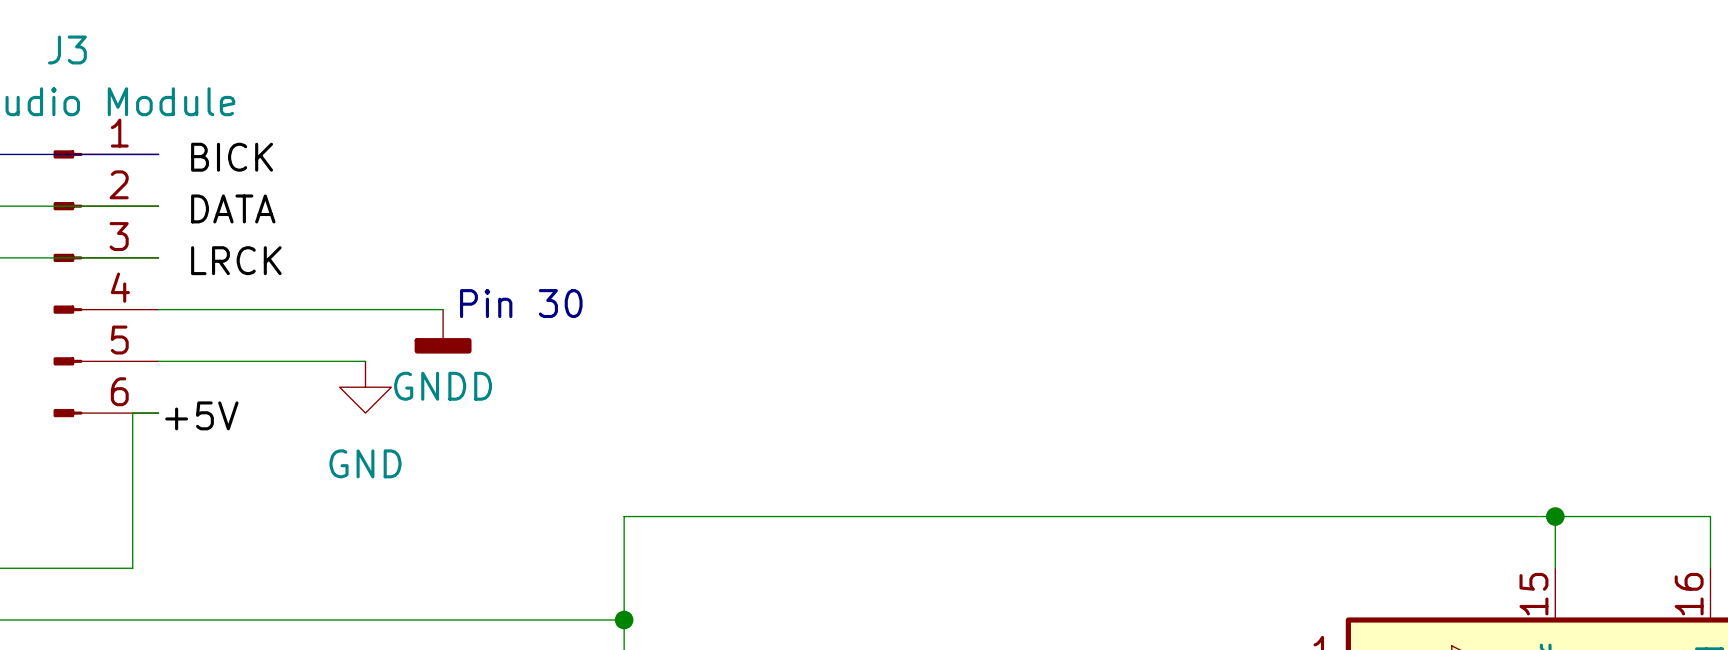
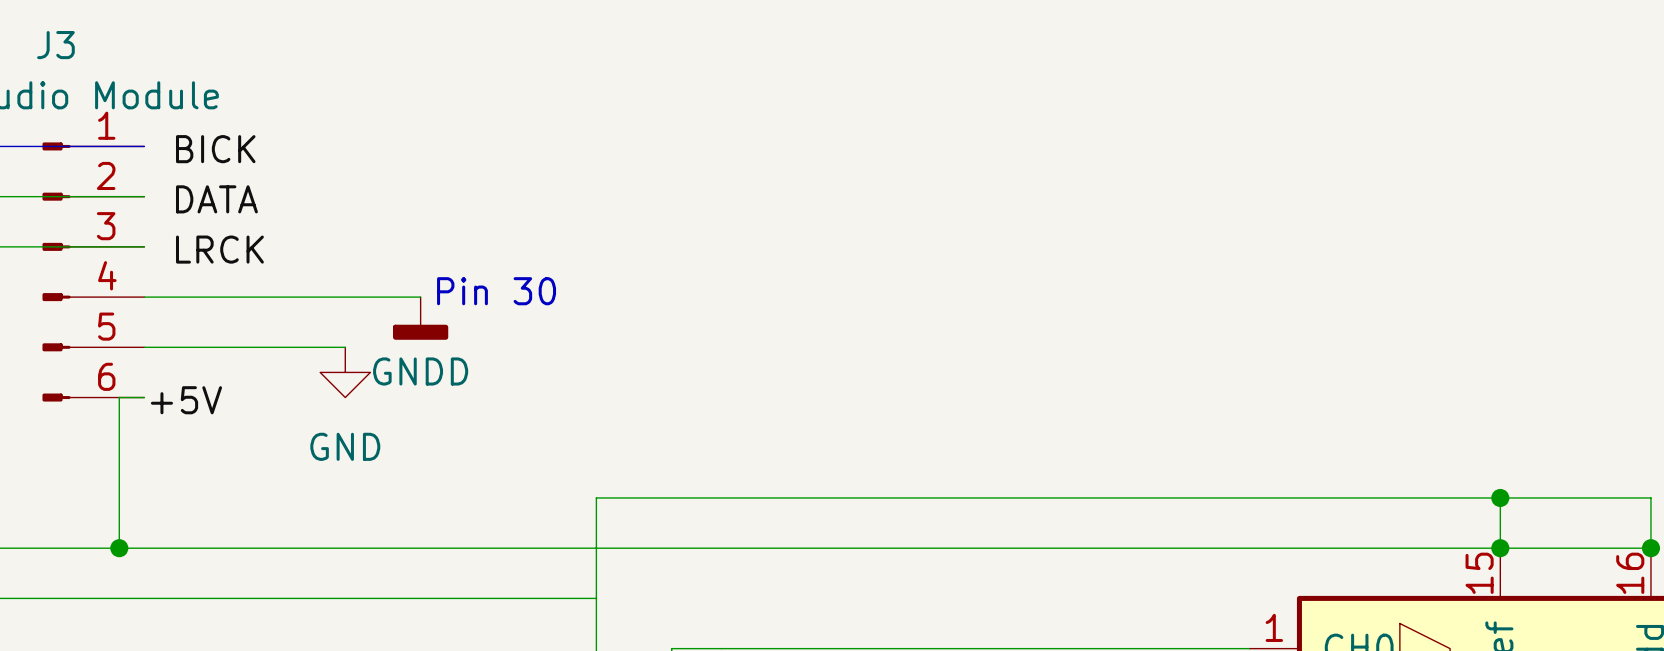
wire: none -> (119, 548) (1650, 548)
junction: none -> (119, 548)
junction: none -> (1500, 548)
junction: none -> (1650, 548)
junction: (624, 620) -> none

